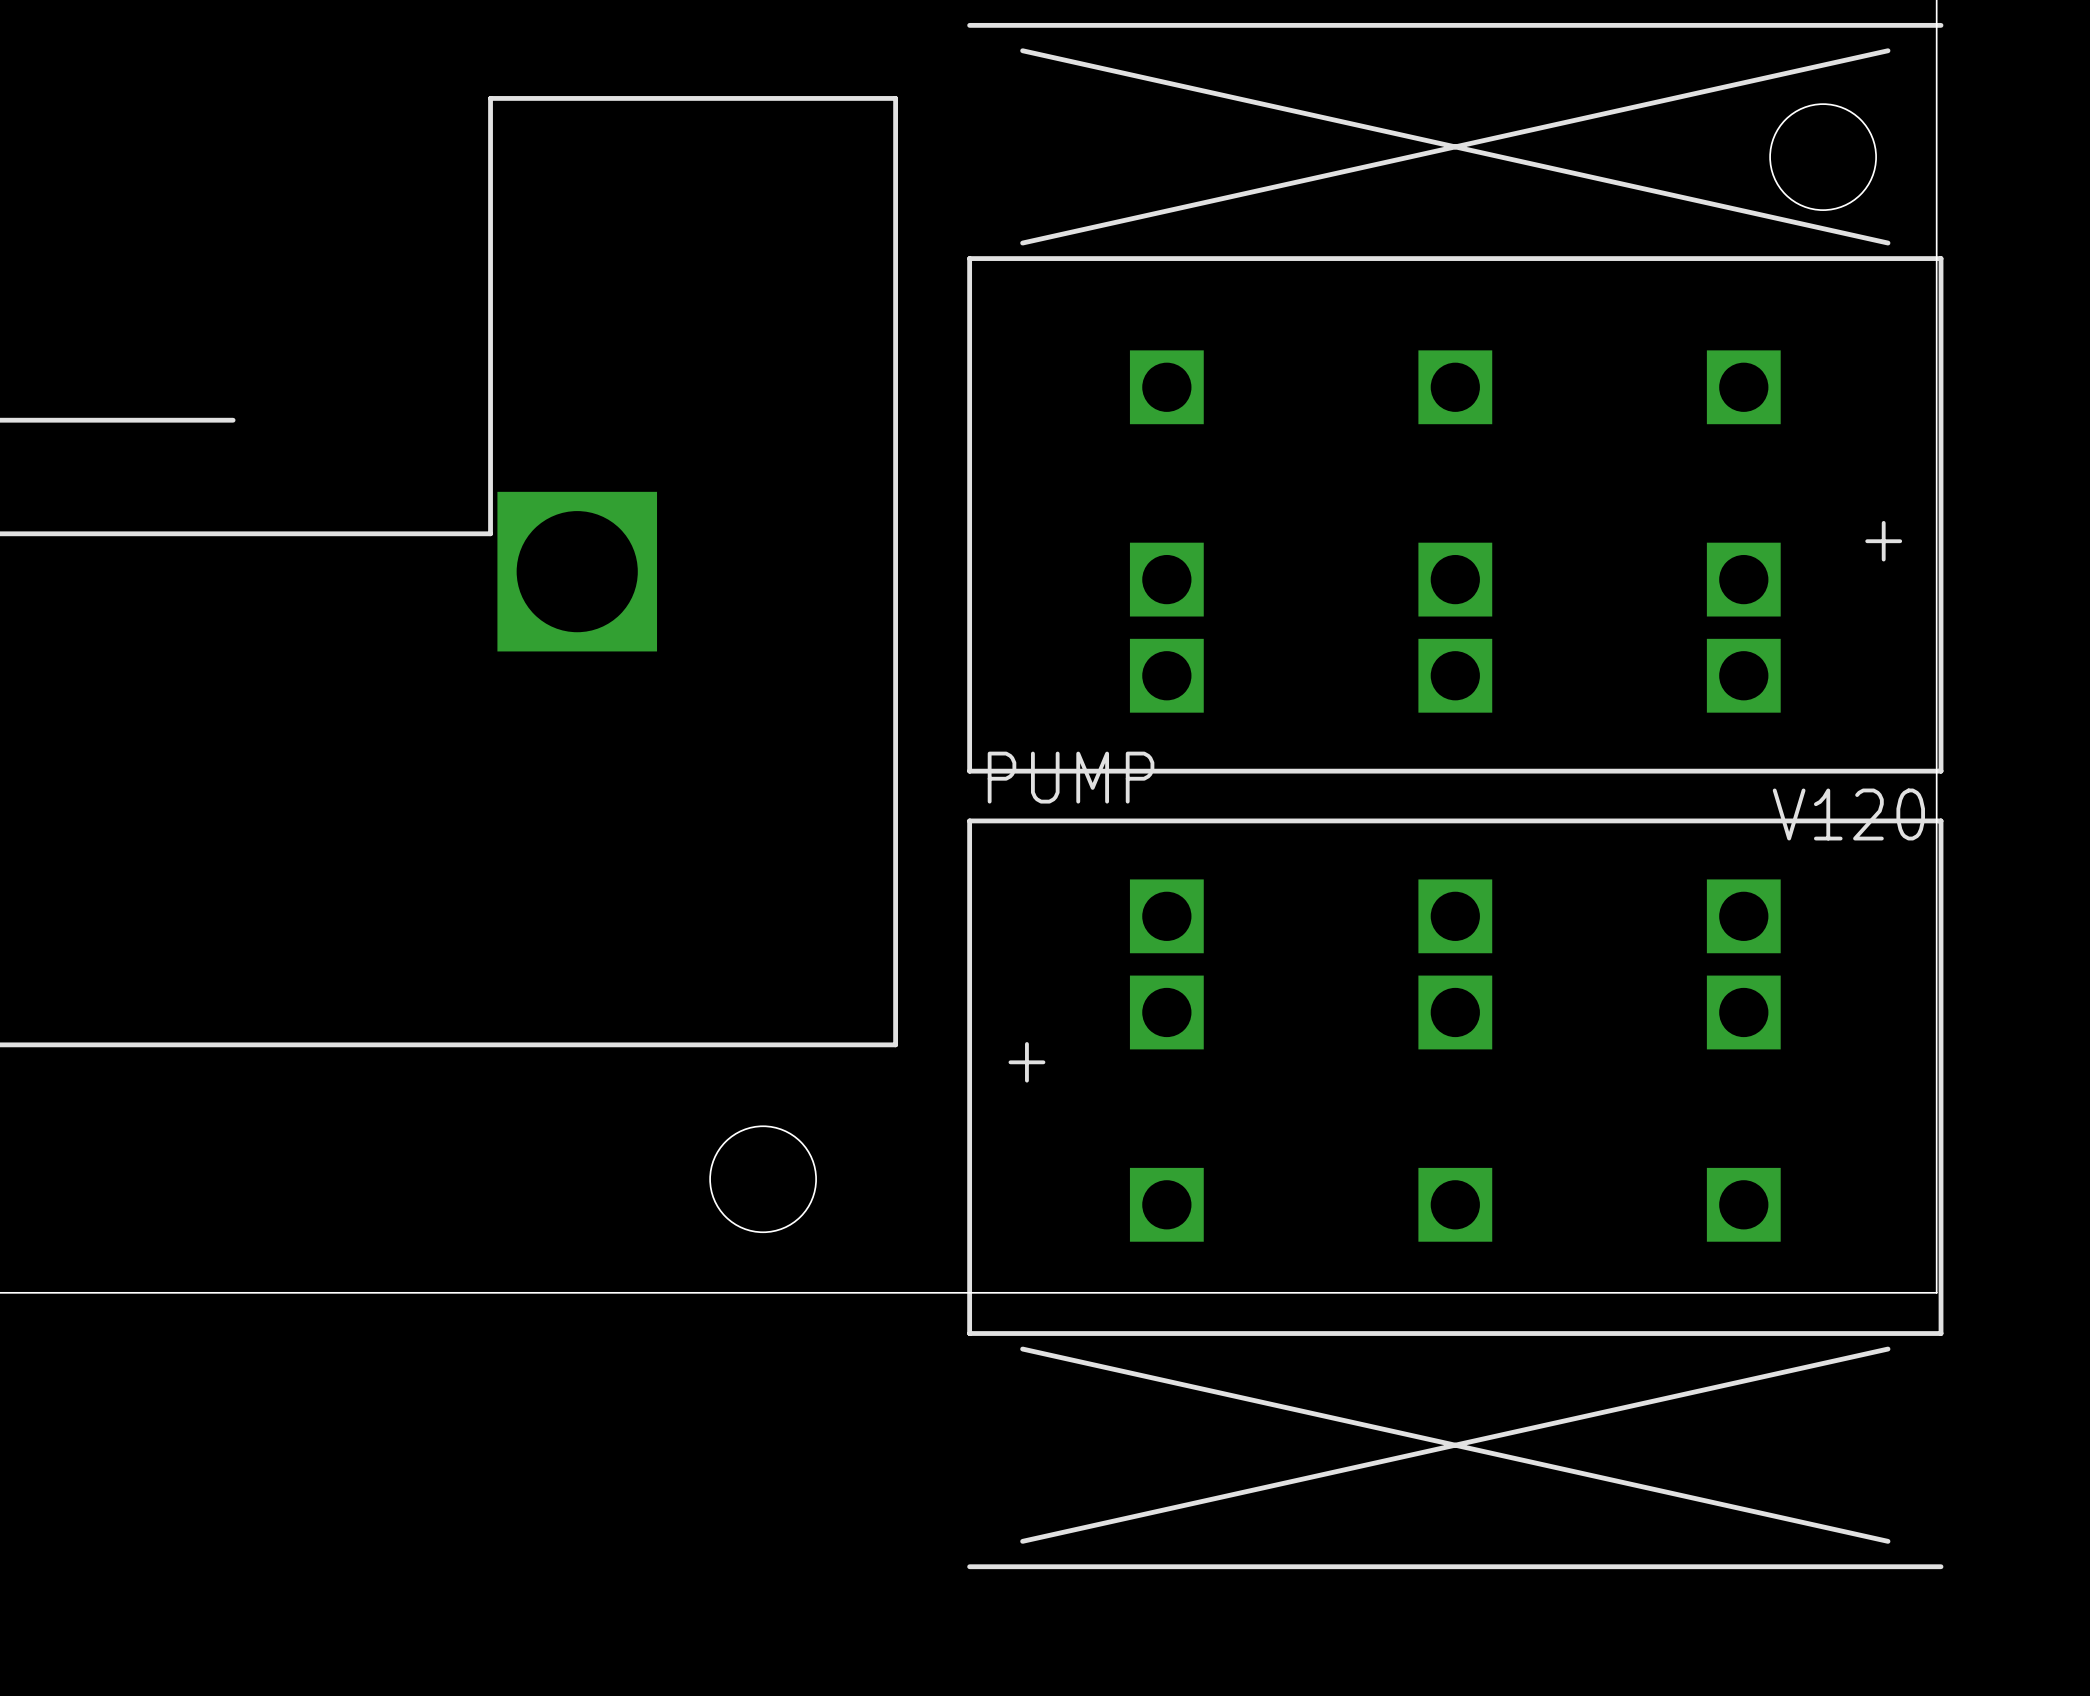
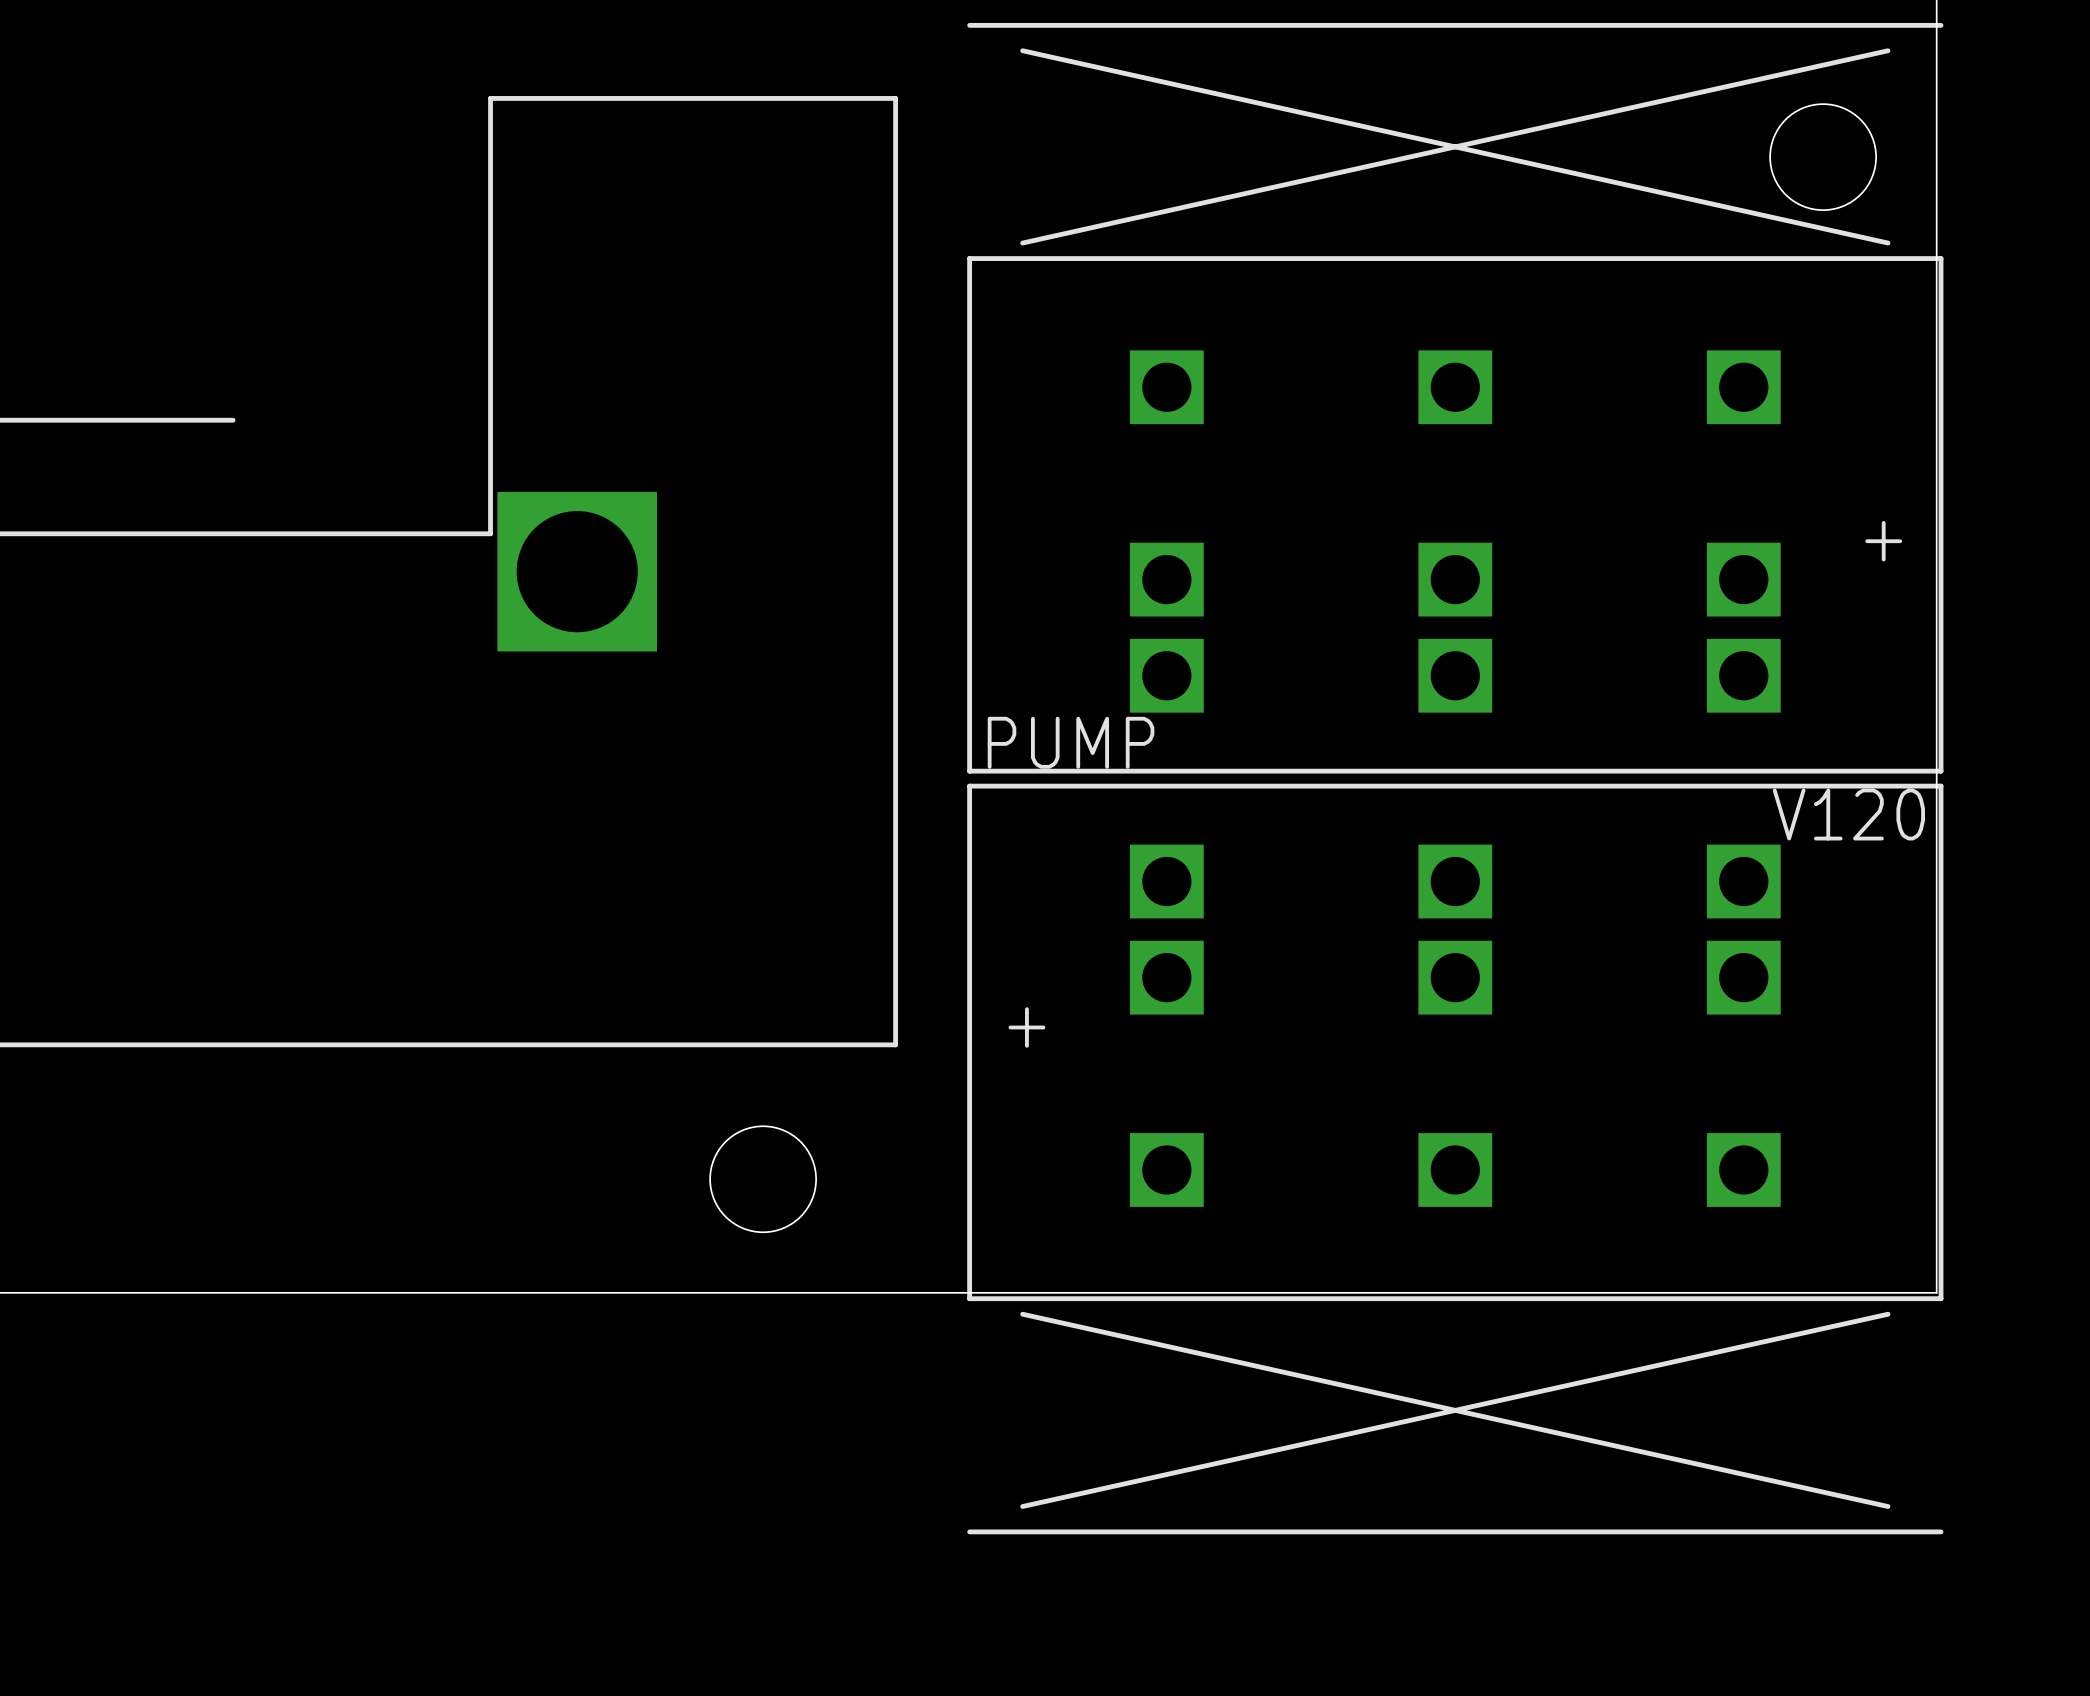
PUMP position: (1455, 1193) -> (1455, 1159)

